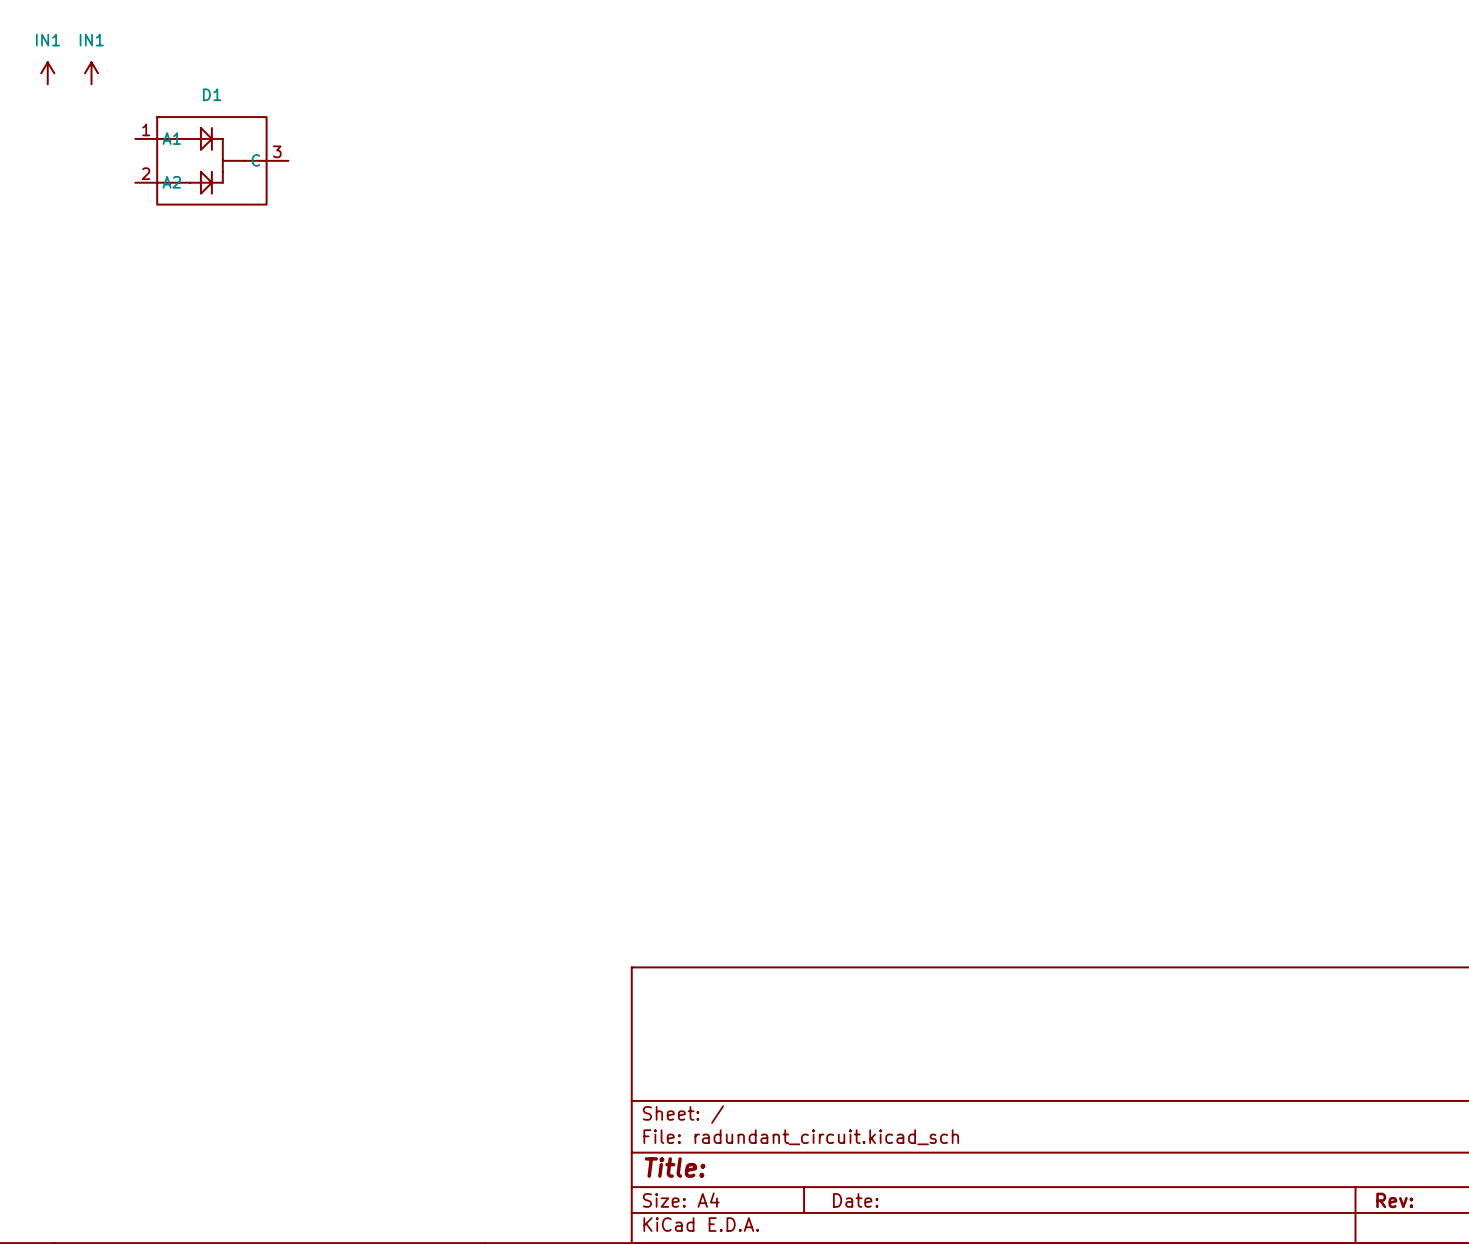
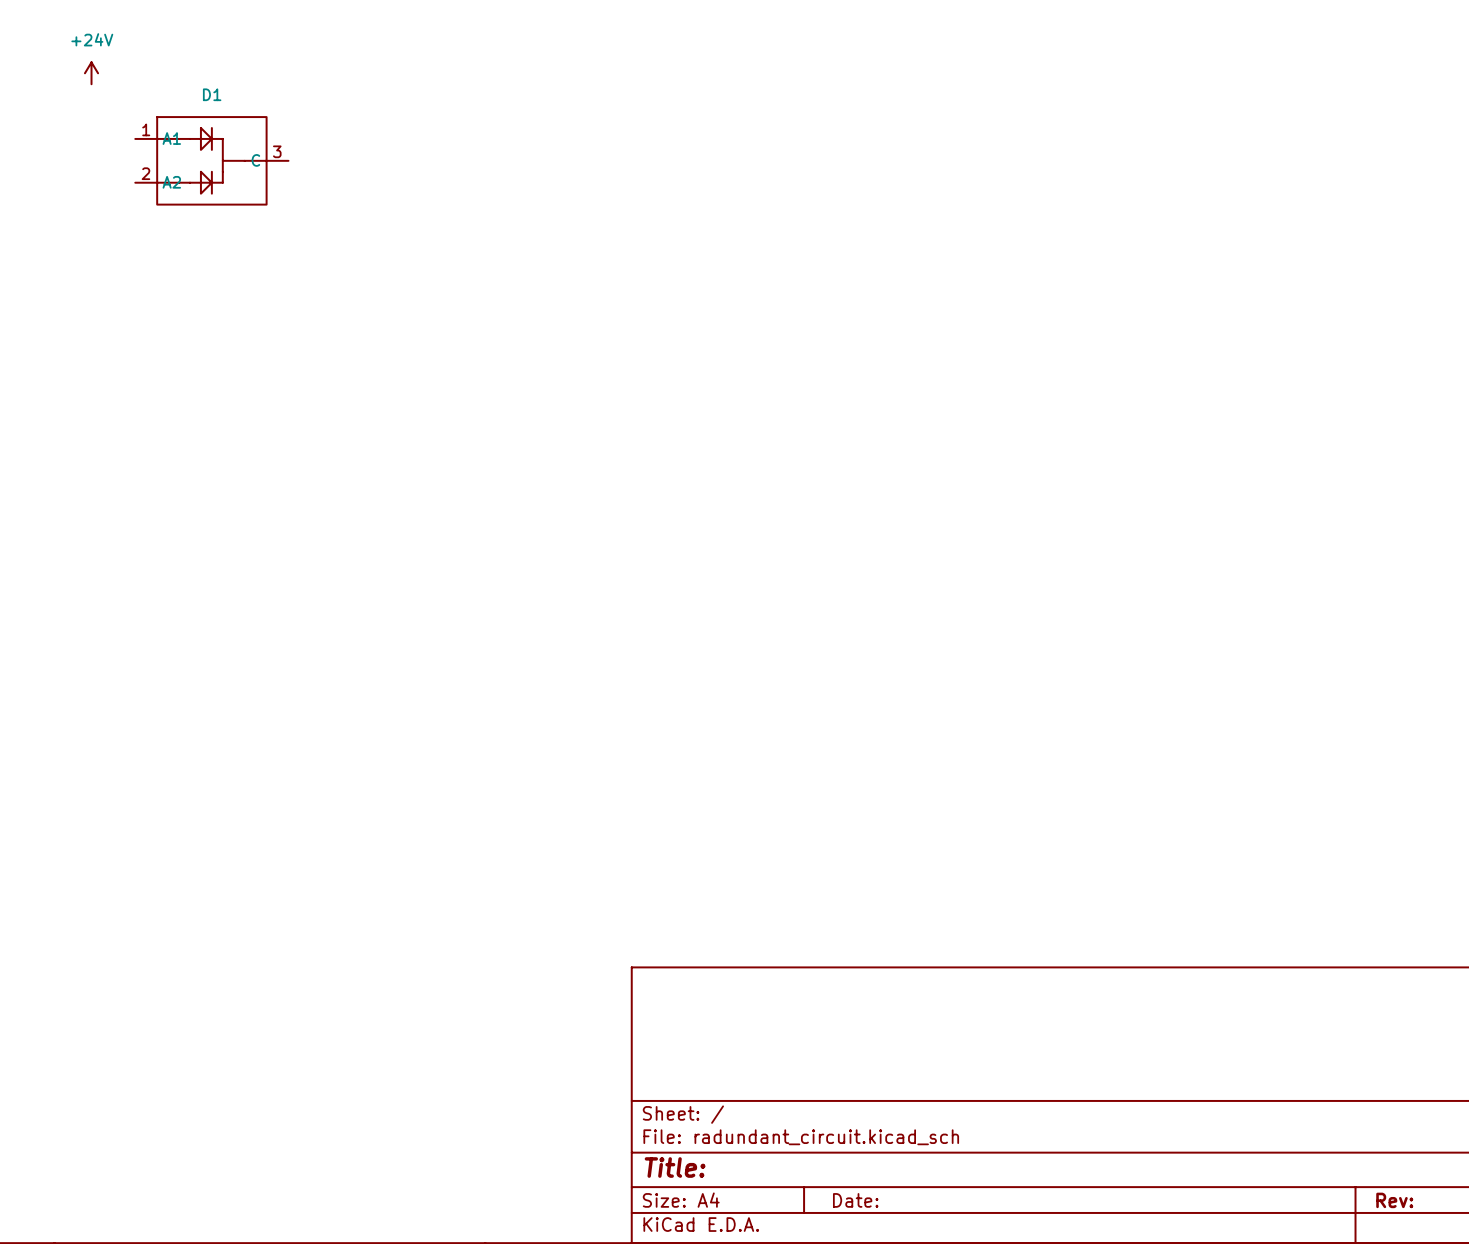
power symbol: IN1 (47, 73) -> none
power symbol: IN1 (91, 73) -> +24V (91, 73)

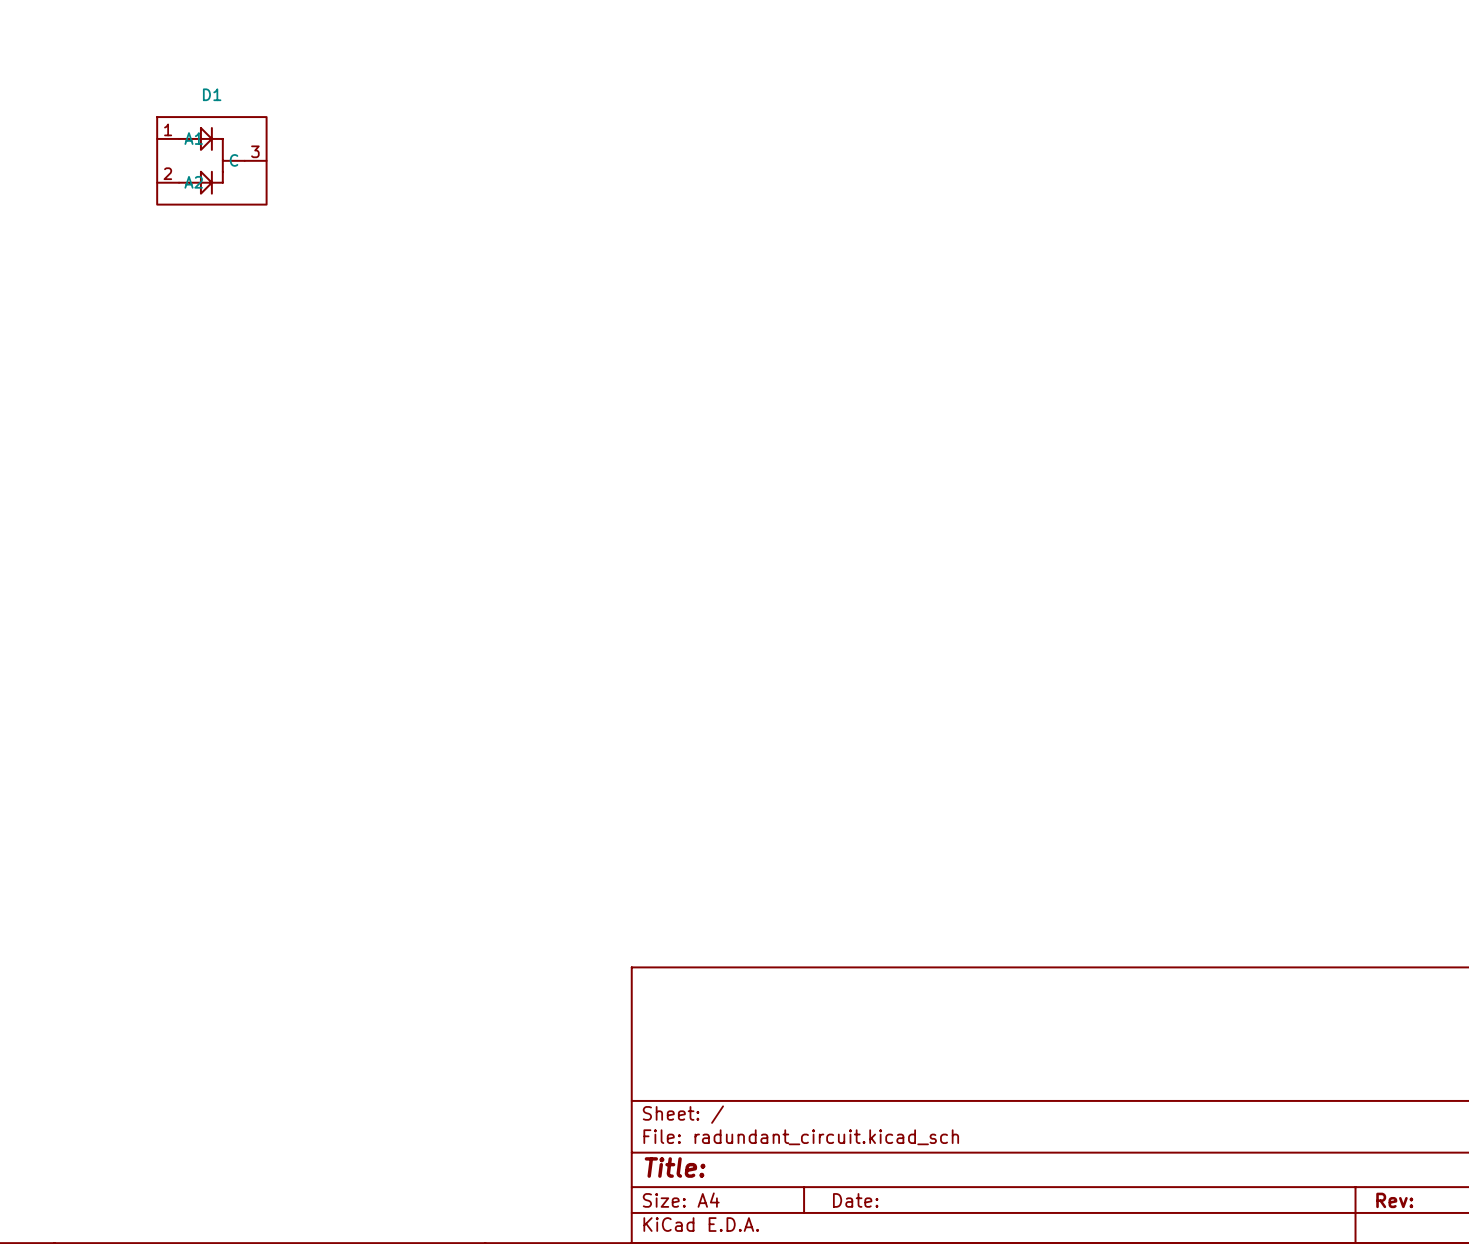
power symbol: +24V (91, 73) -> none
D1 symbol: [135, 117, 289, 205] -> [157, 117, 267, 205]

